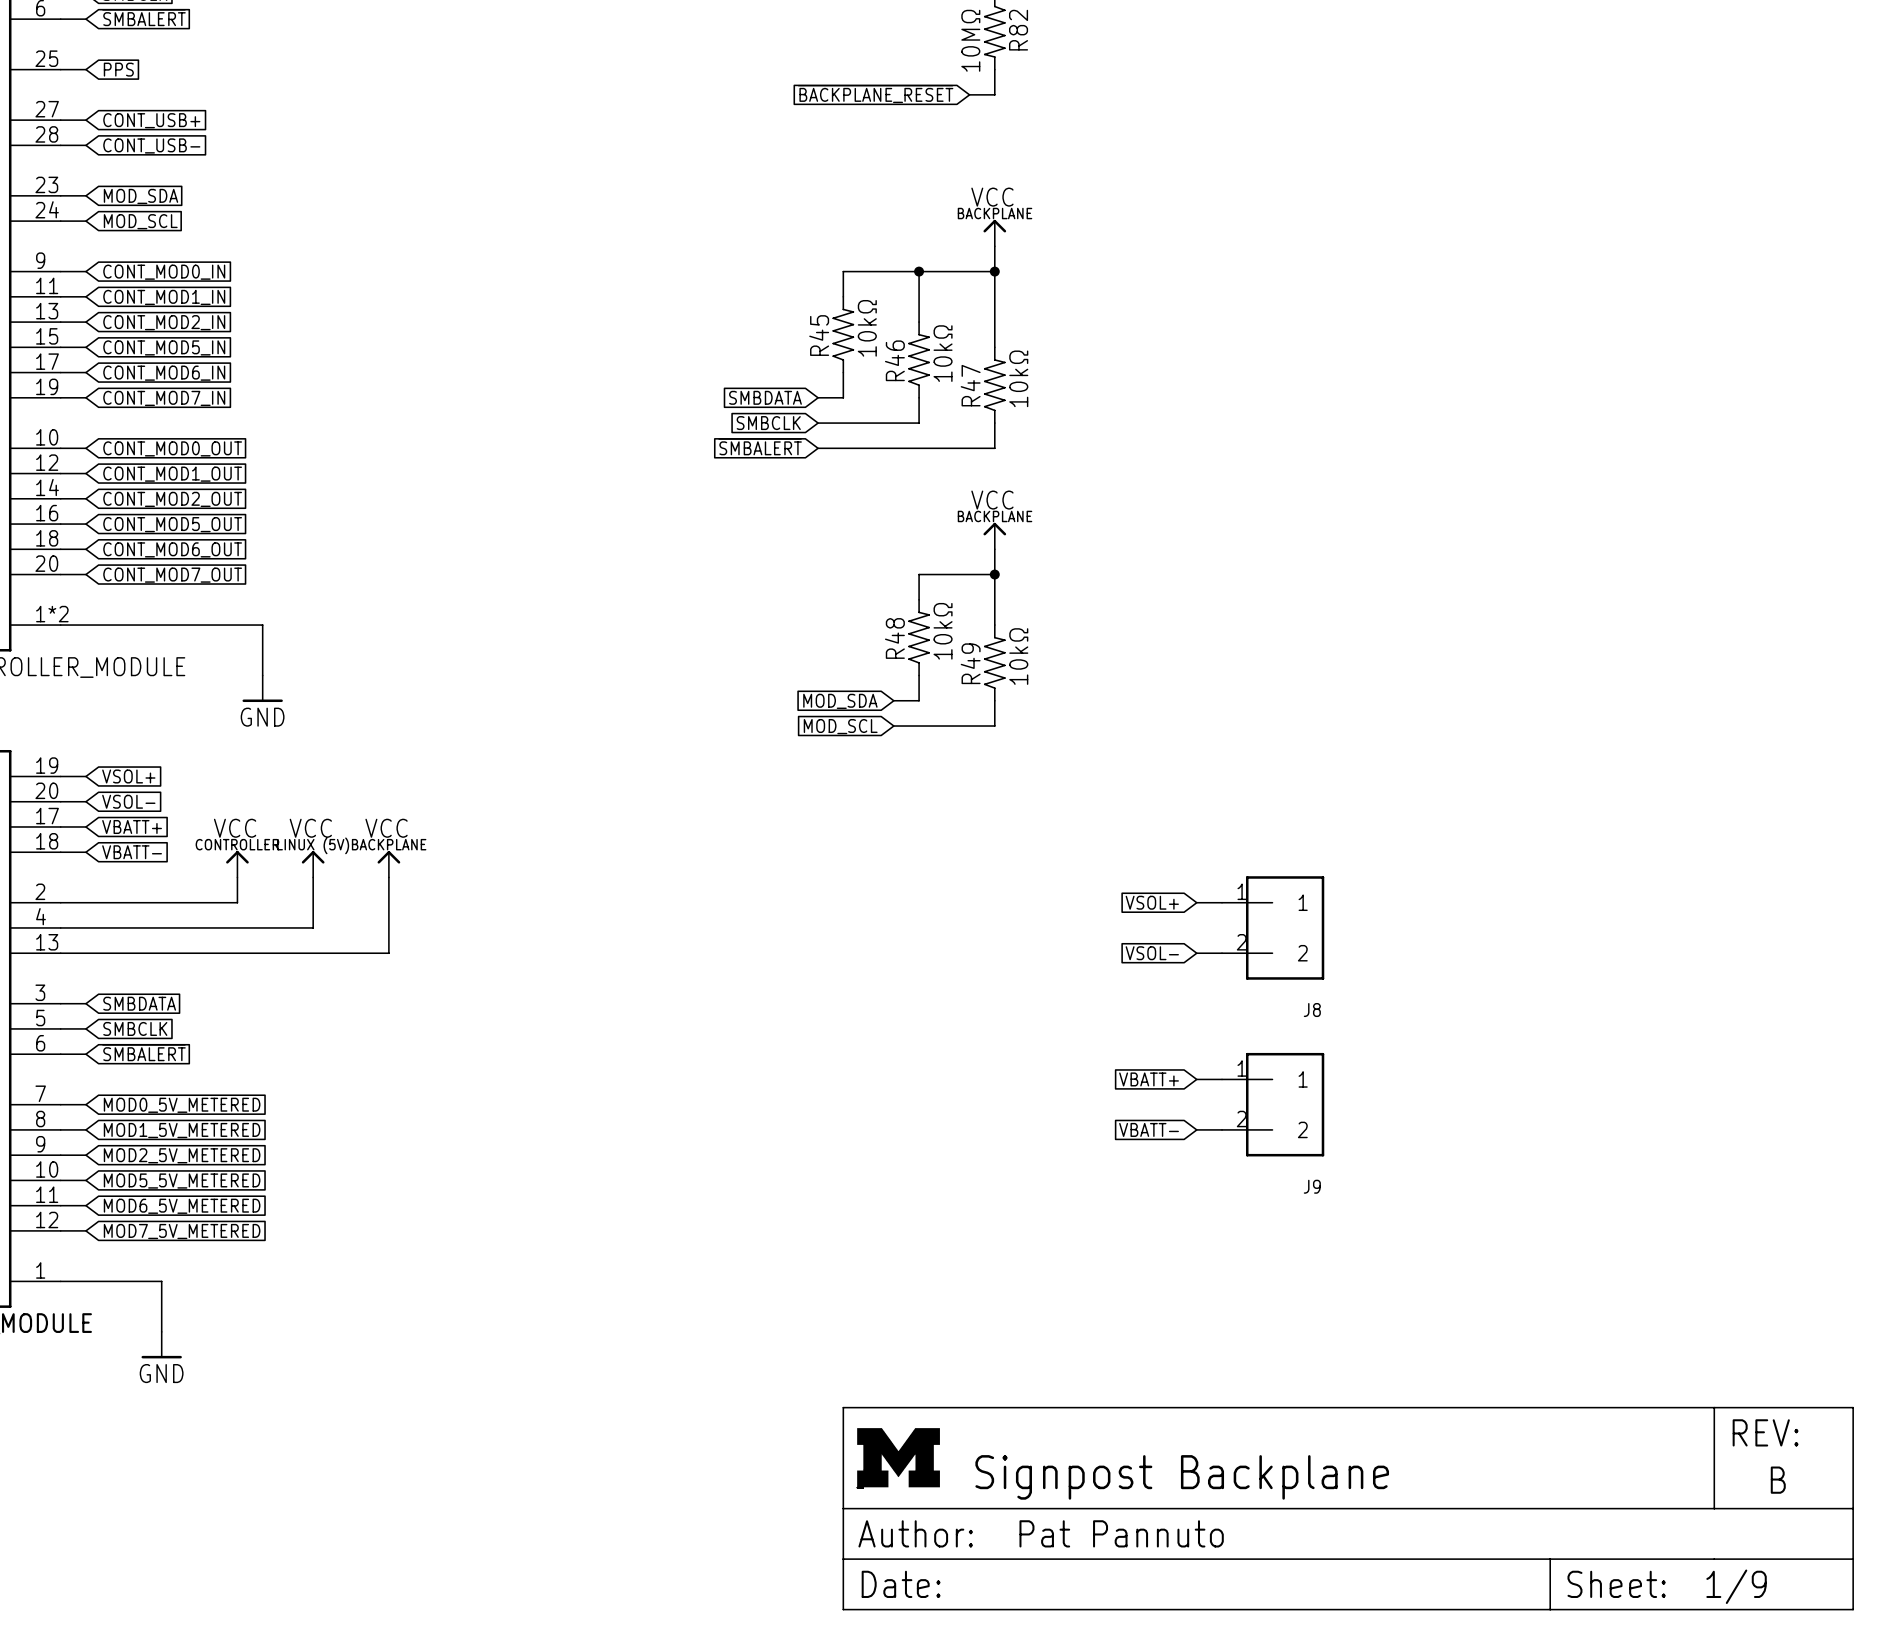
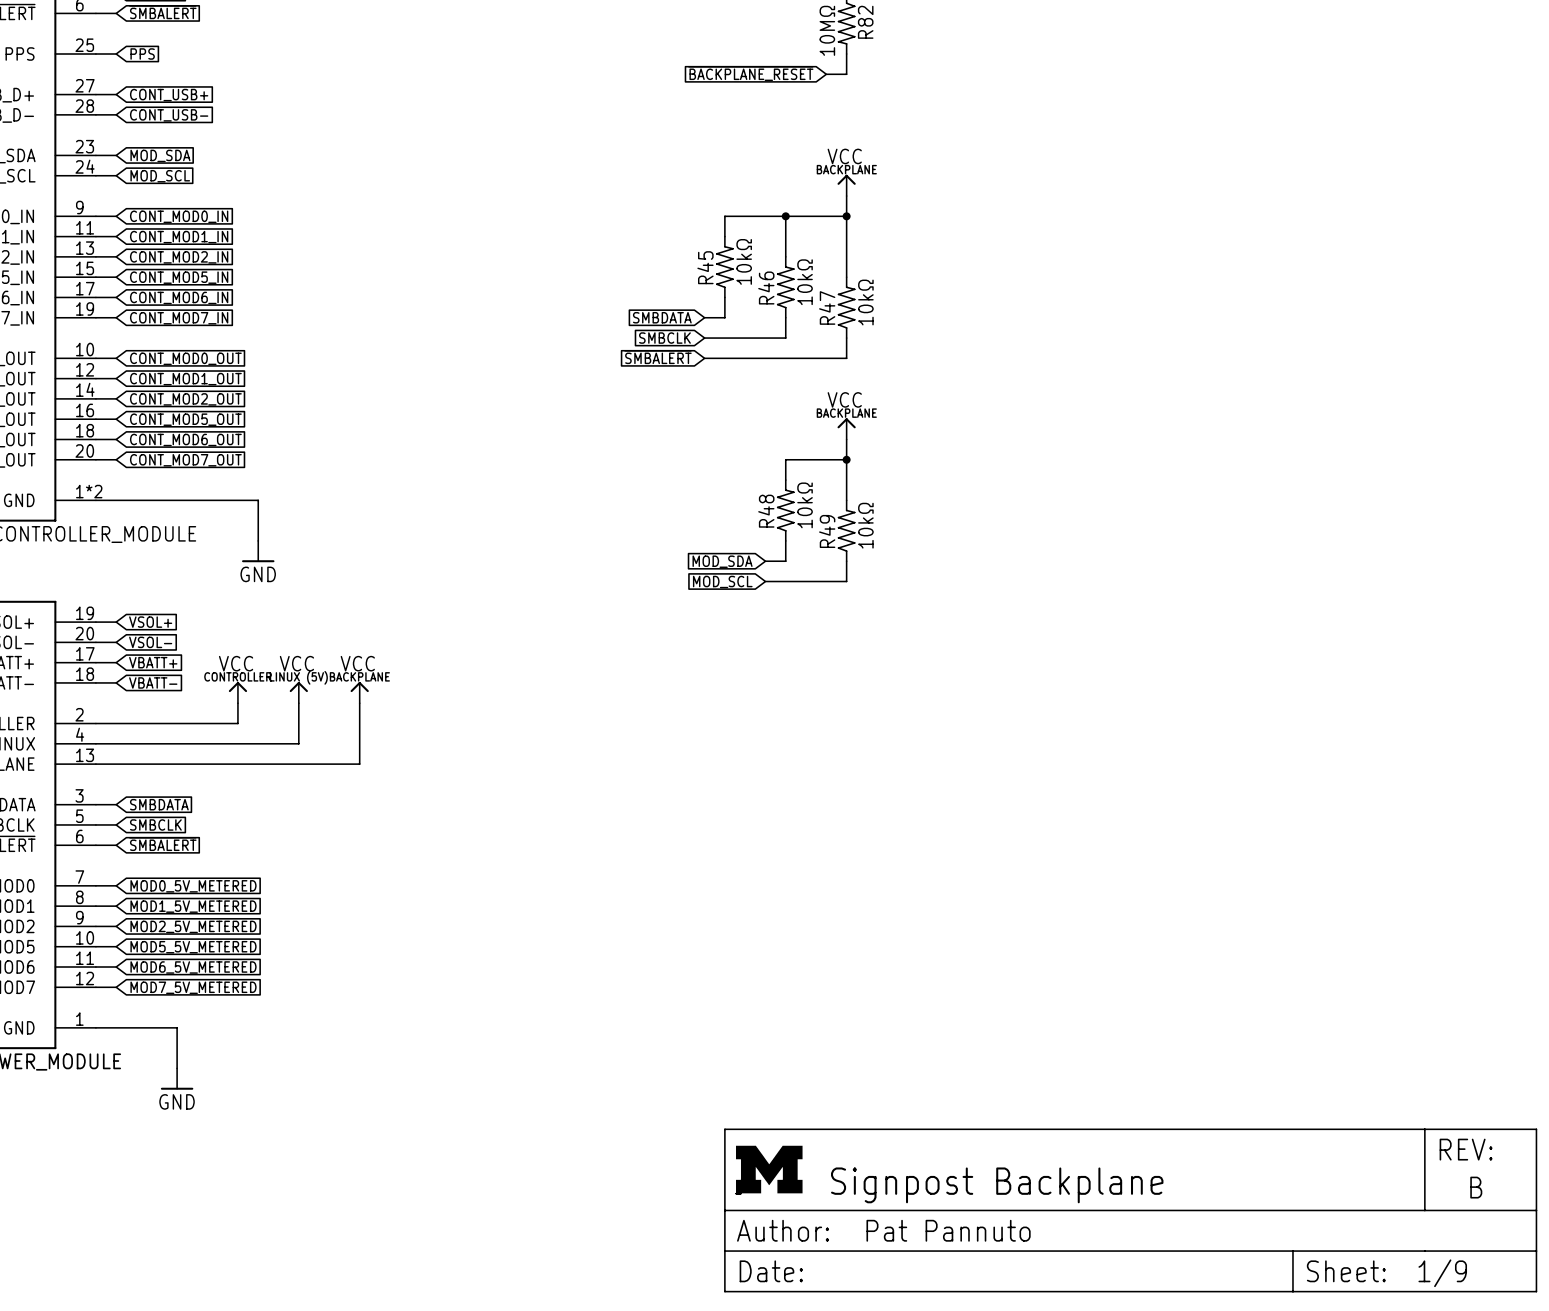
global label: VSOL+ (1152, 902) -> none
wire: (1196, 902) (1222, 902) -> none
J8: (1273, 927) -> none
global label: VSOL- (1152, 953) -> none
wire: (1196, 953) (1222, 953) -> none
global label: VBATT+ (1149, 1079) -> none
wire: (1196, 1079) (1222, 1079) -> none
J9: (1273, 1104) -> none
global label: VBATT- (1149, 1129) -> none
wire: (1196, 1129) (1222, 1129) -> none

